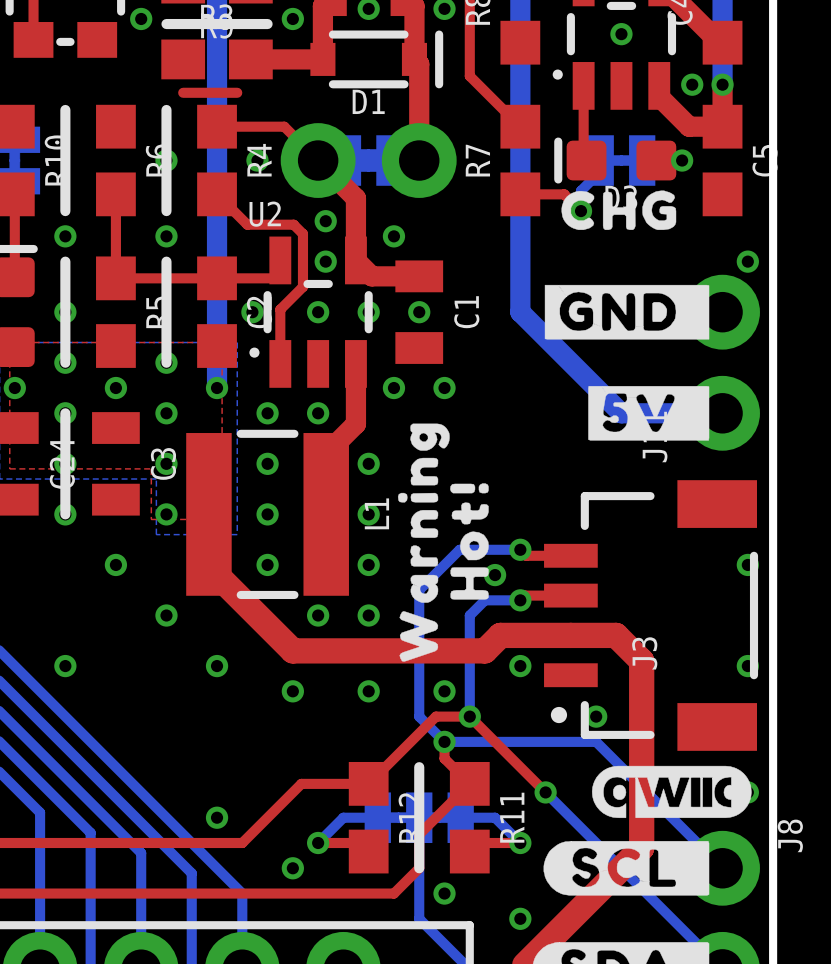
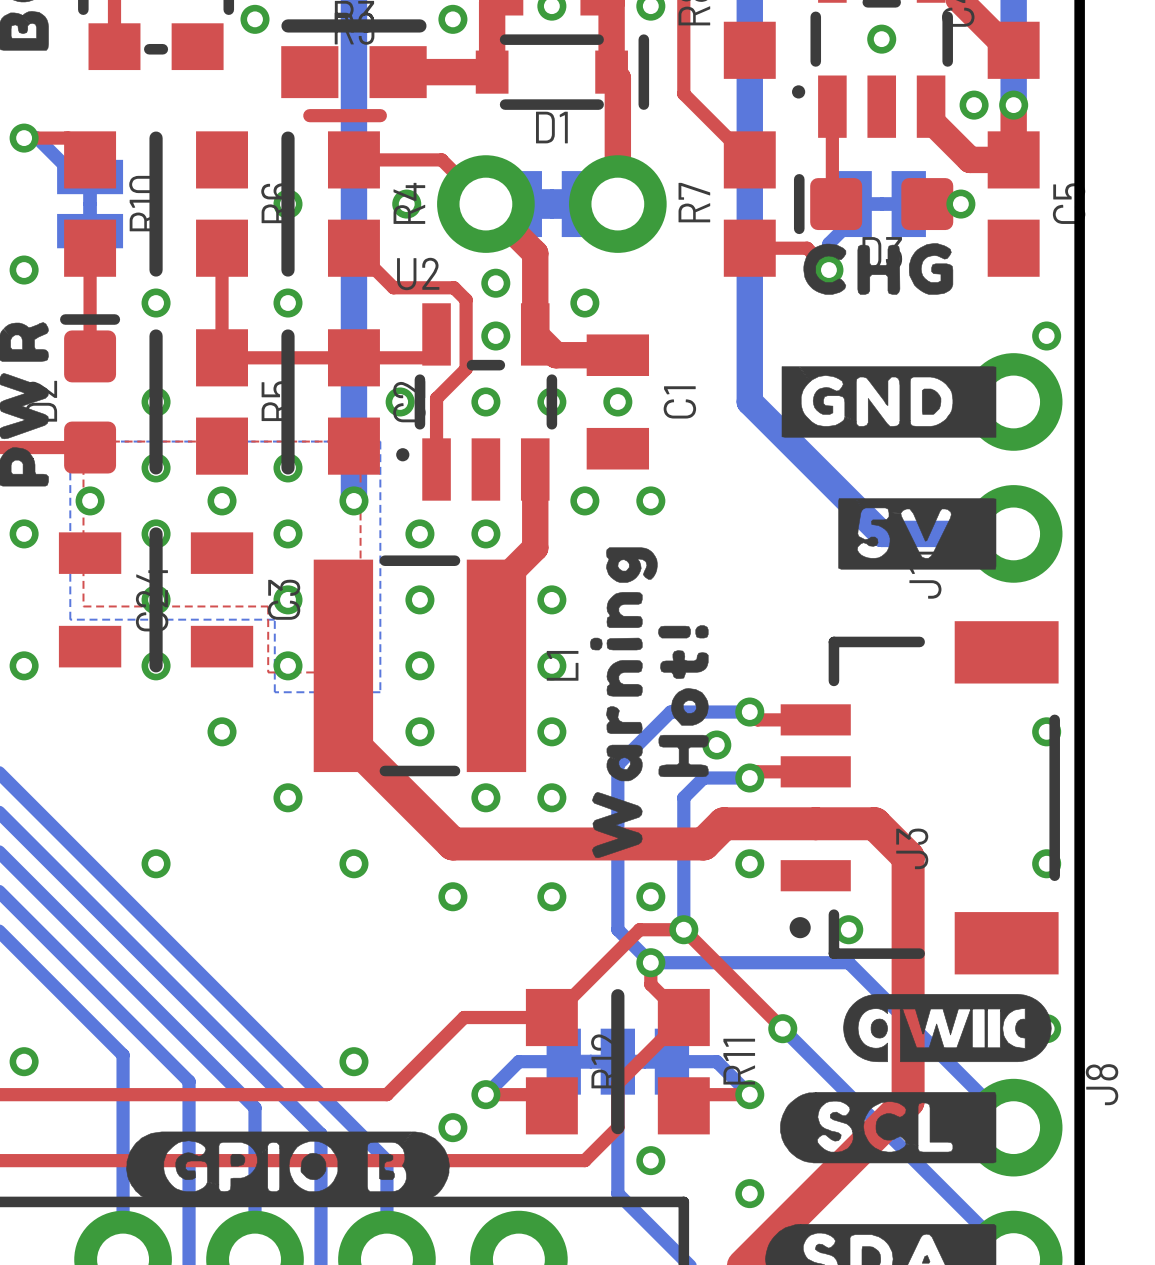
drawing: none -> [126, 1131, 450, 1203]

